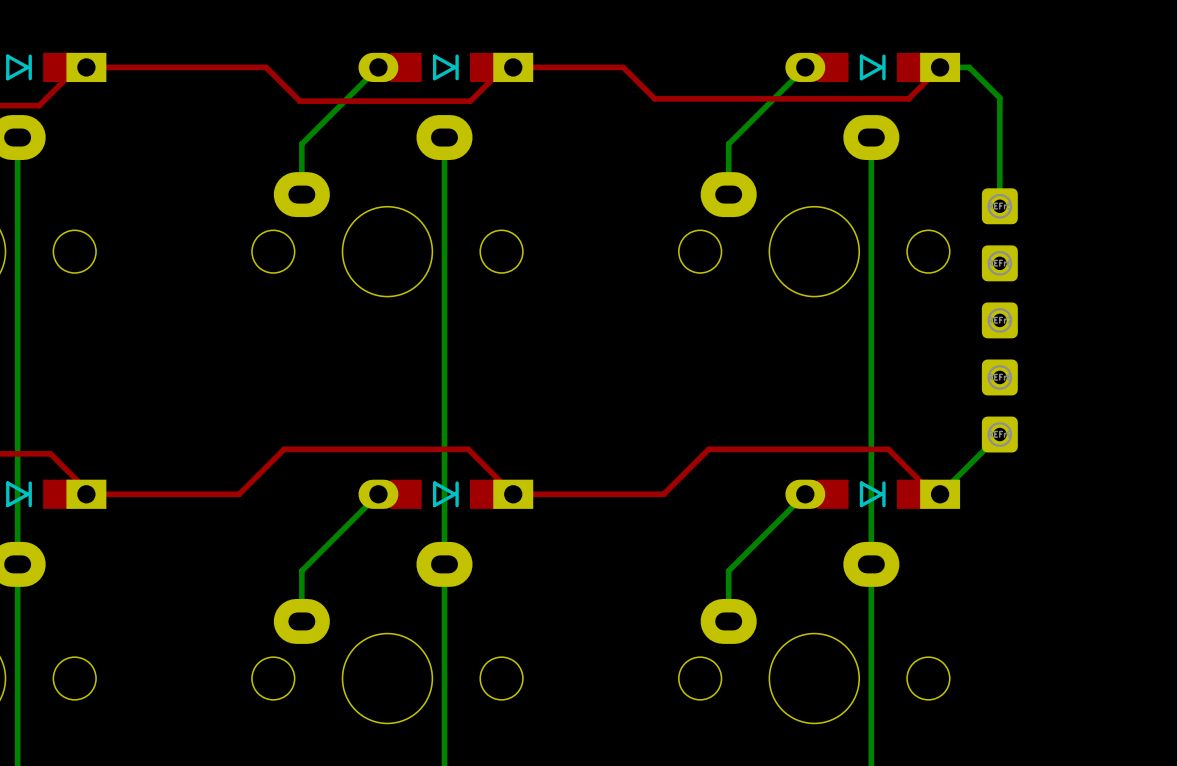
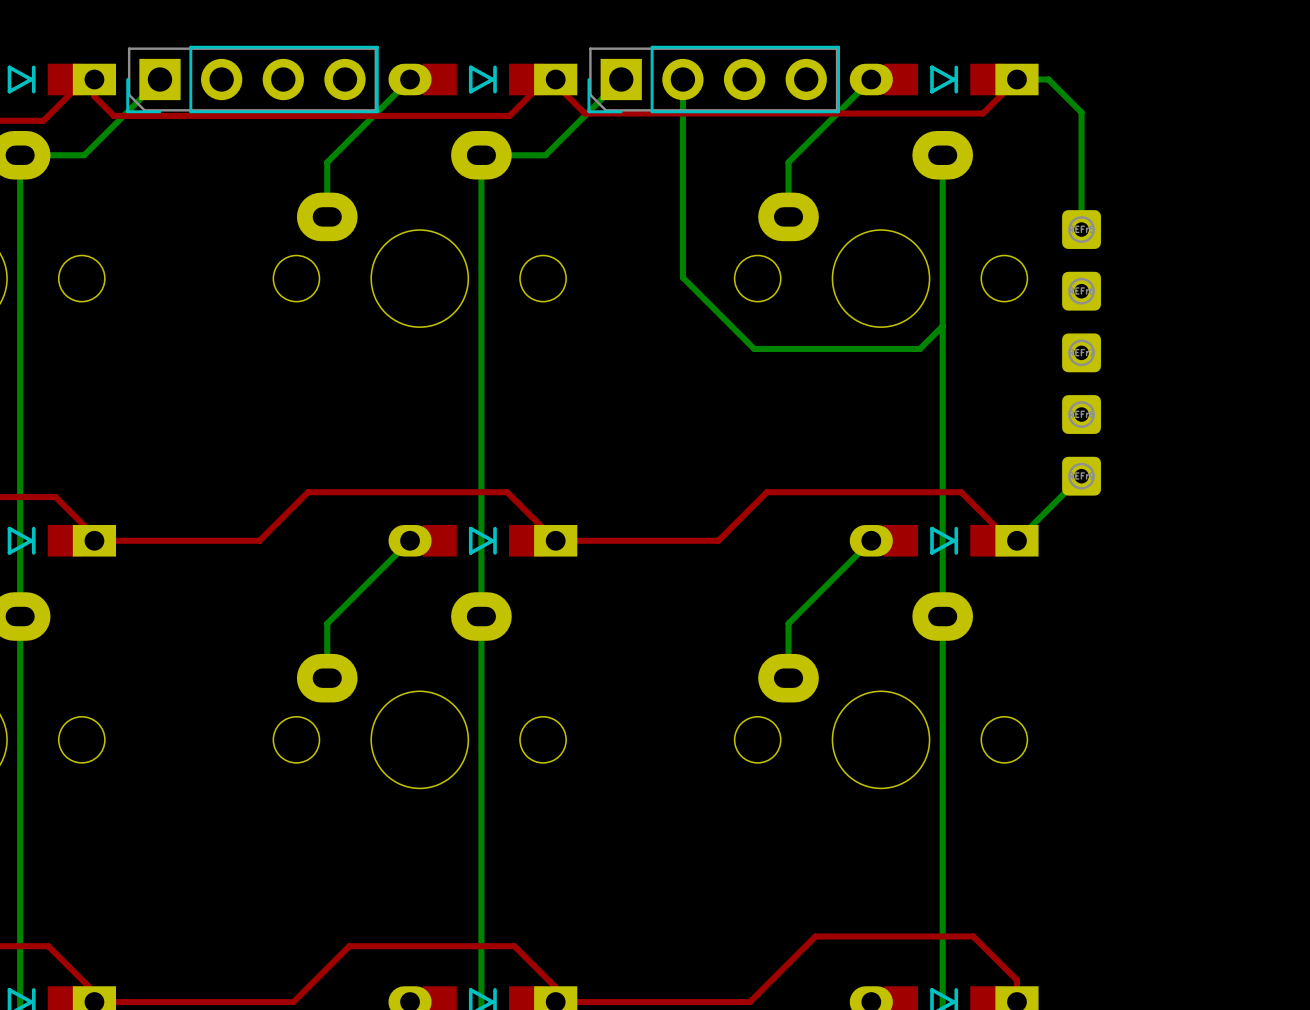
top track: (77, 67) (266, 67) (299, 101) -> (94, 79) (94, 96) (113, 115) (325, 115)
bottom track: none -> (159, 79) (84, 155) (20, 155)
part: none -> (252, 79)
top track: (504, 67) (623, 67) (654, 98) -> (555, 79) (555, 84) (584, 113) (708, 113)
bottom track: none -> (621, 79) (545, 155) (481, 155)
bottom track: none -> (682, 79) (682, 277) (754, 348) (919, 348) (942, 326)
part: none -> (713, 79)

